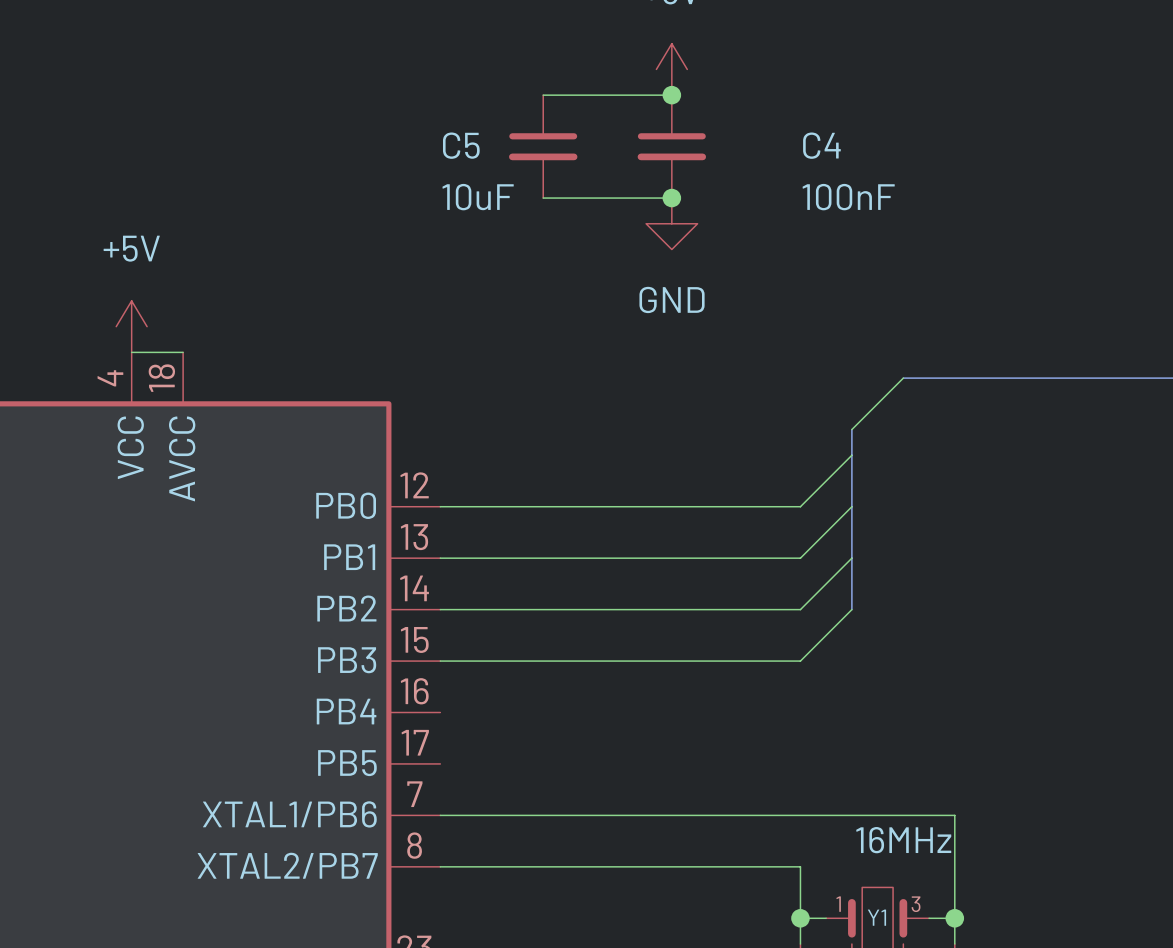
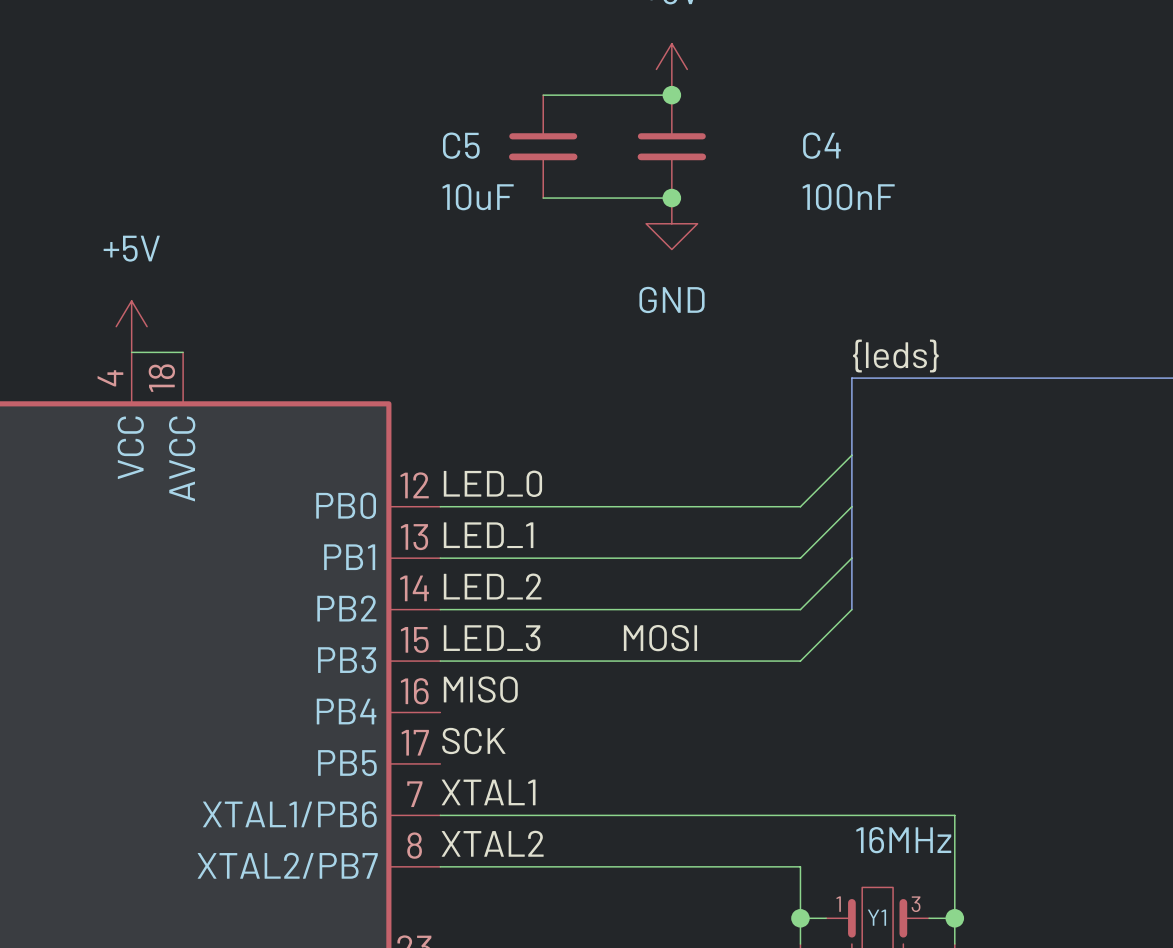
label: none -> {leds} (895, 356)
wire: (903, 378) (851, 429) -> none
bus: none -> (903, 378) (851, 378) (851, 429)
label: none -> LED_0 (492, 483)
label: none -> LED_1 (488, 535)
label: none -> LED_2 (492, 586)
label: none -> LED_3 (492, 638)
label: none -> MOSI (660, 638)
label: none -> MISO (480, 689)
label: none -> SCK (473, 741)
label: none -> XTAL1 (488, 792)
label: none -> XTAL2 (492, 843)

